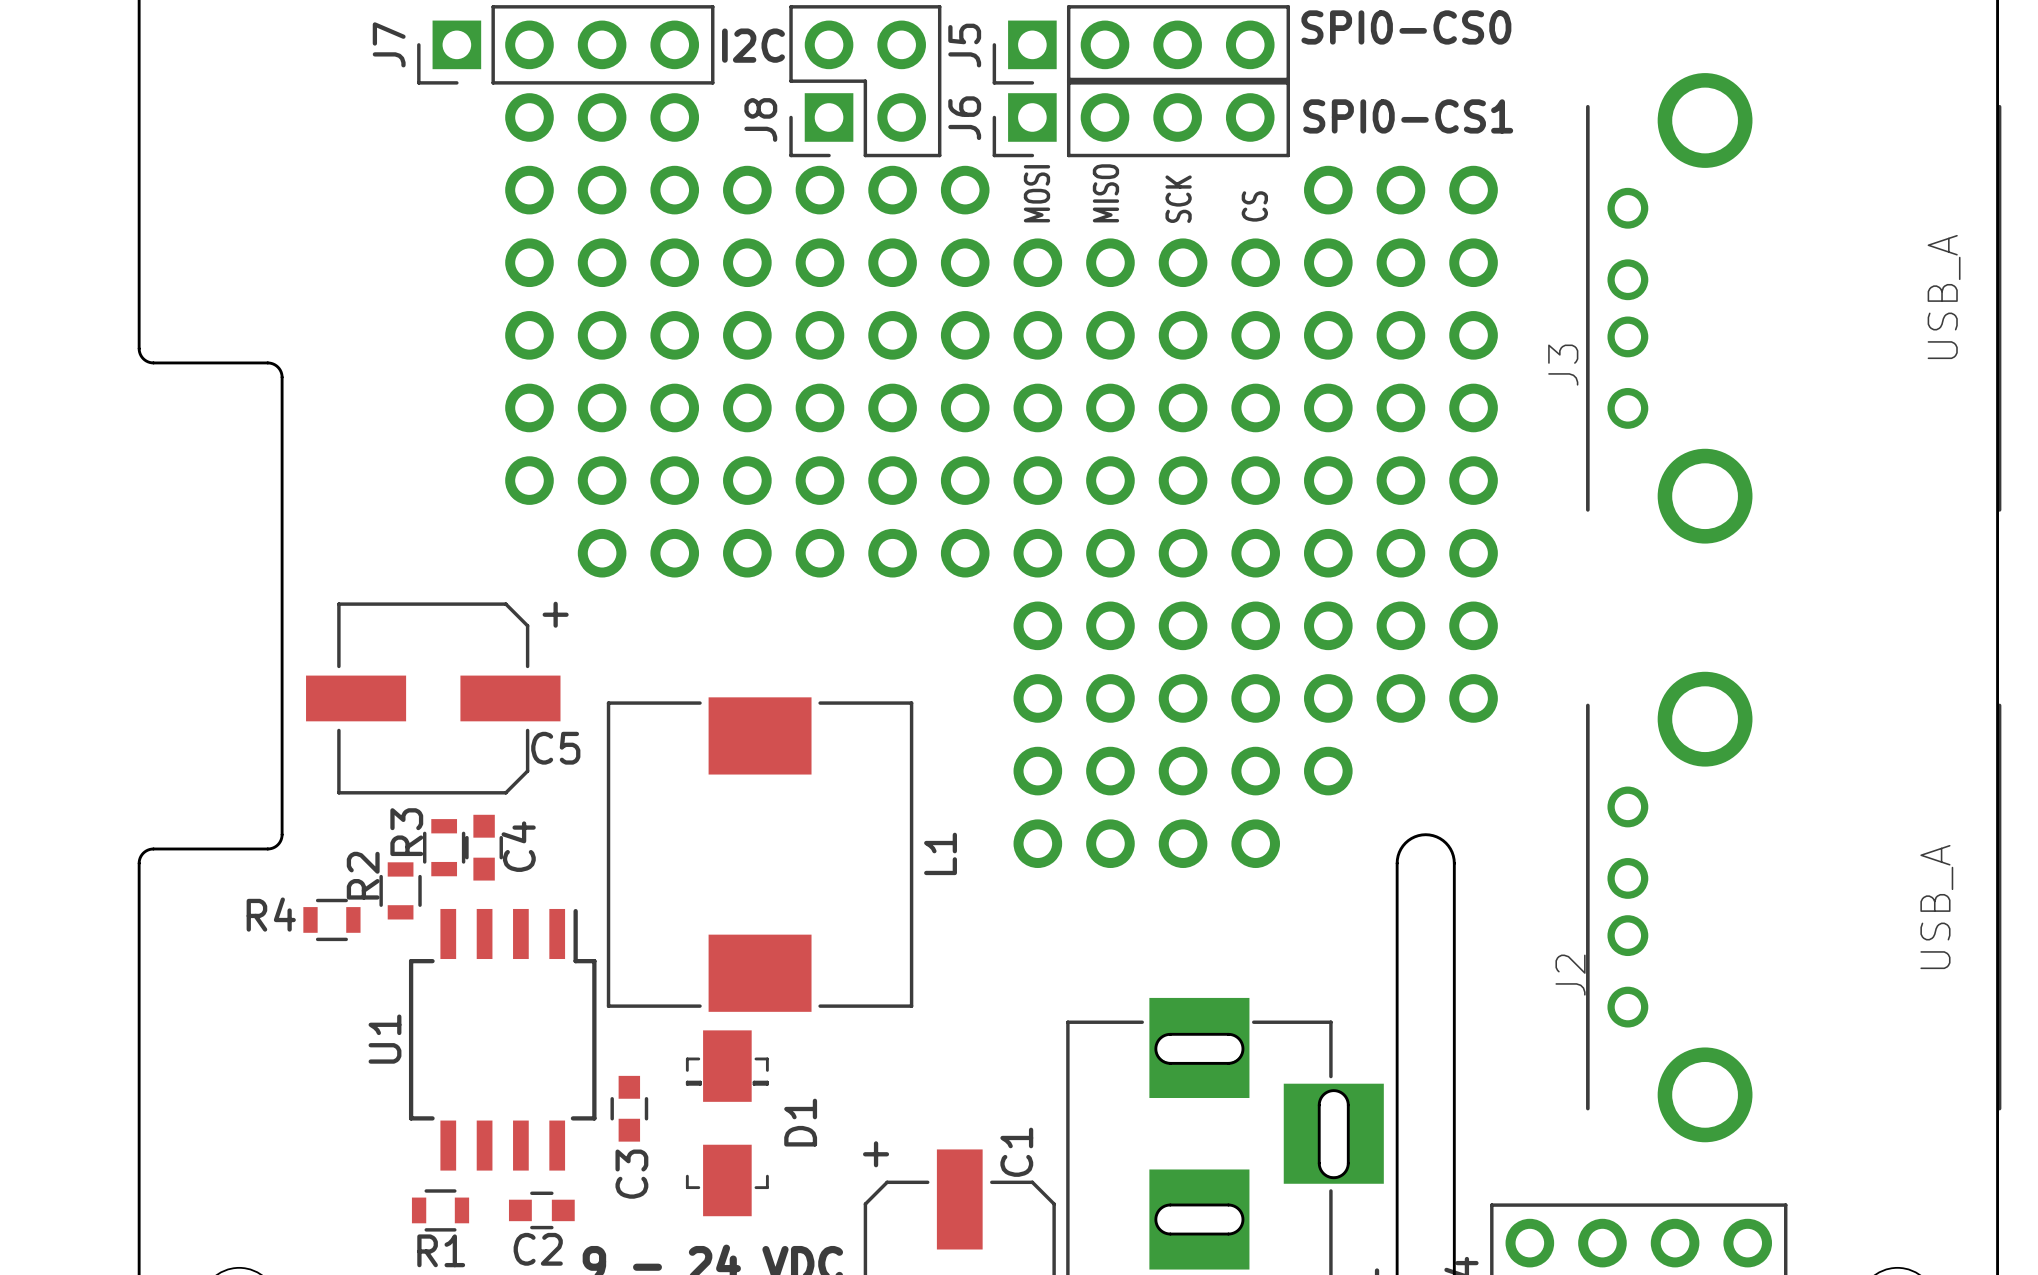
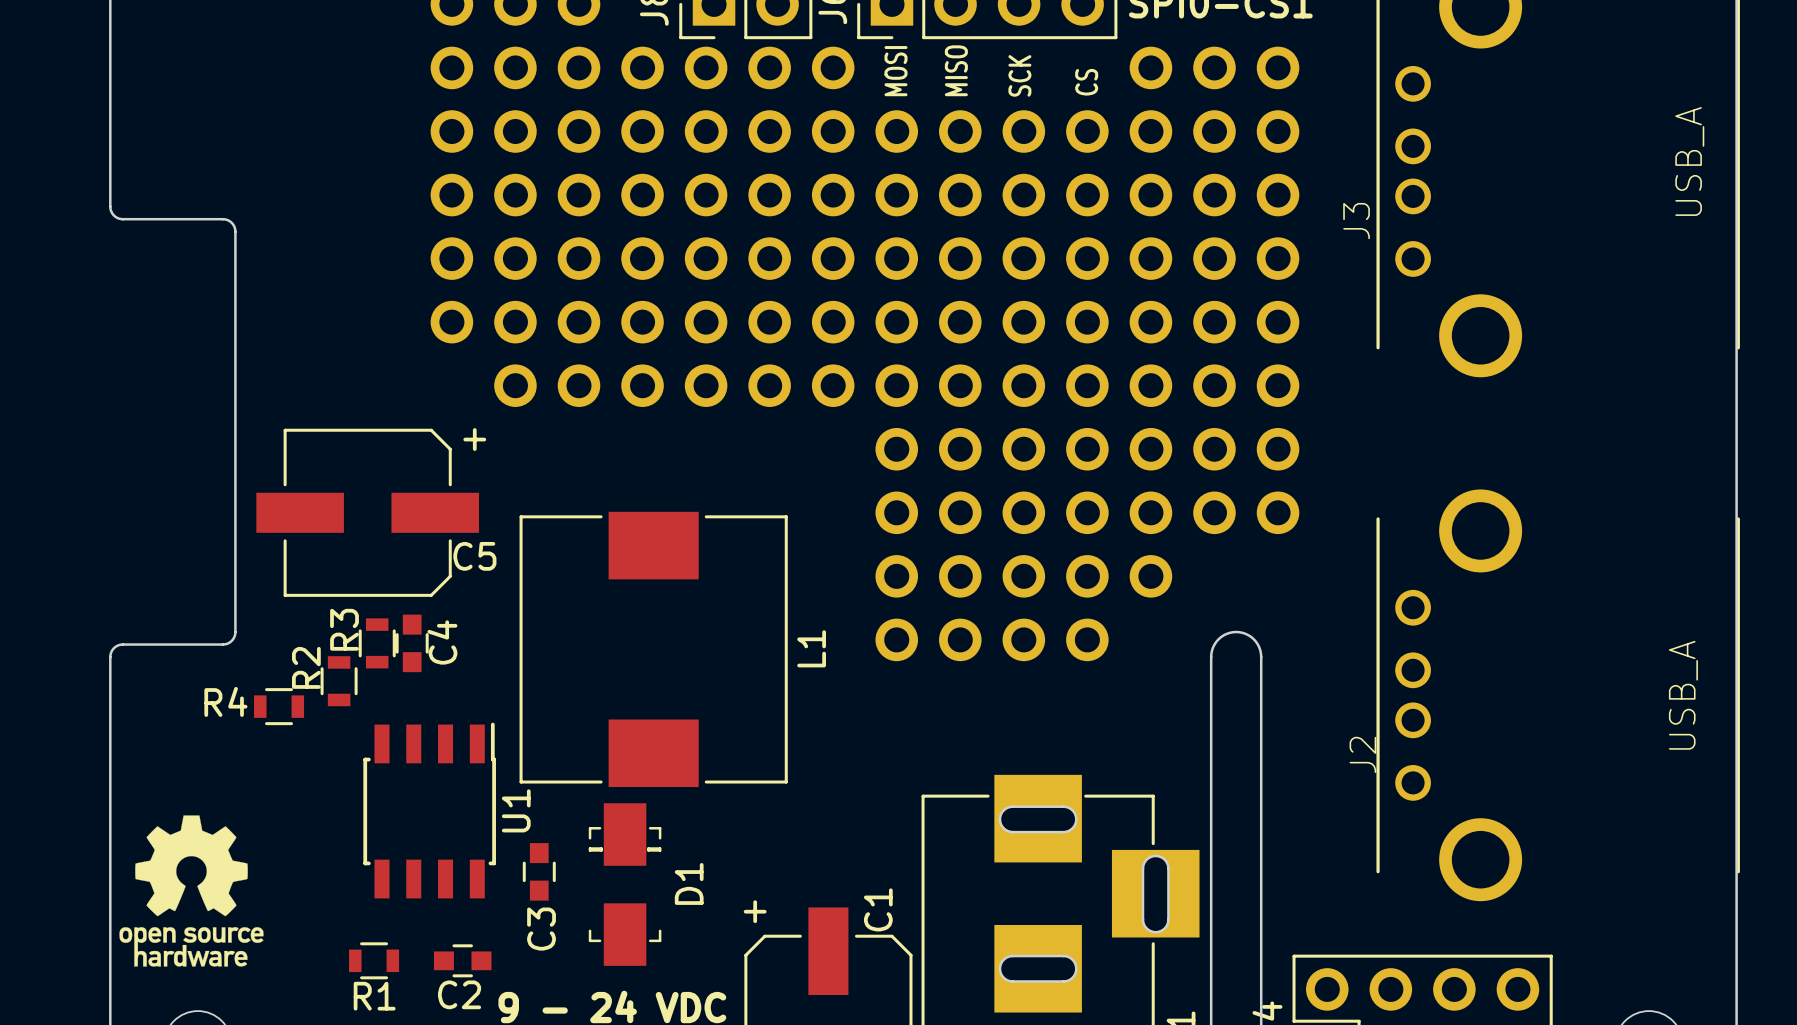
U1 footprint: [408, 908, 597, 1171] -> [363, 722, 496, 899]
U1 name position: U1 (384, 1039) -> U1 (516, 810)
drawing: none -> [119, 815, 264, 967]

